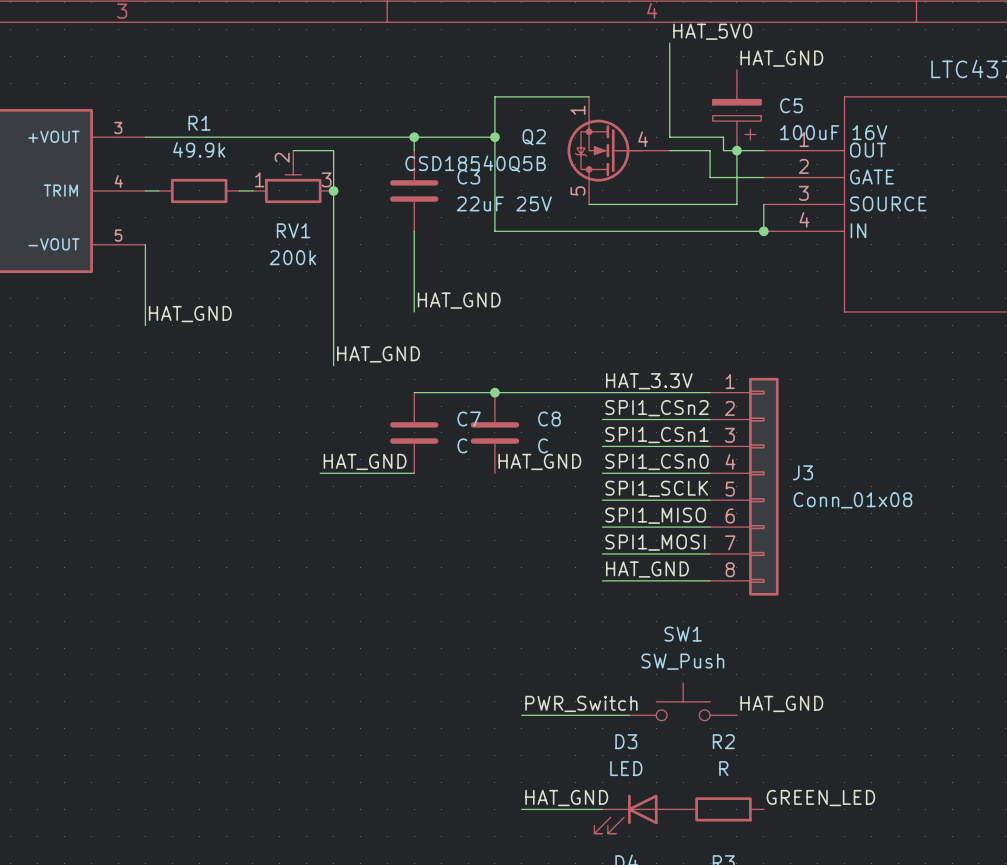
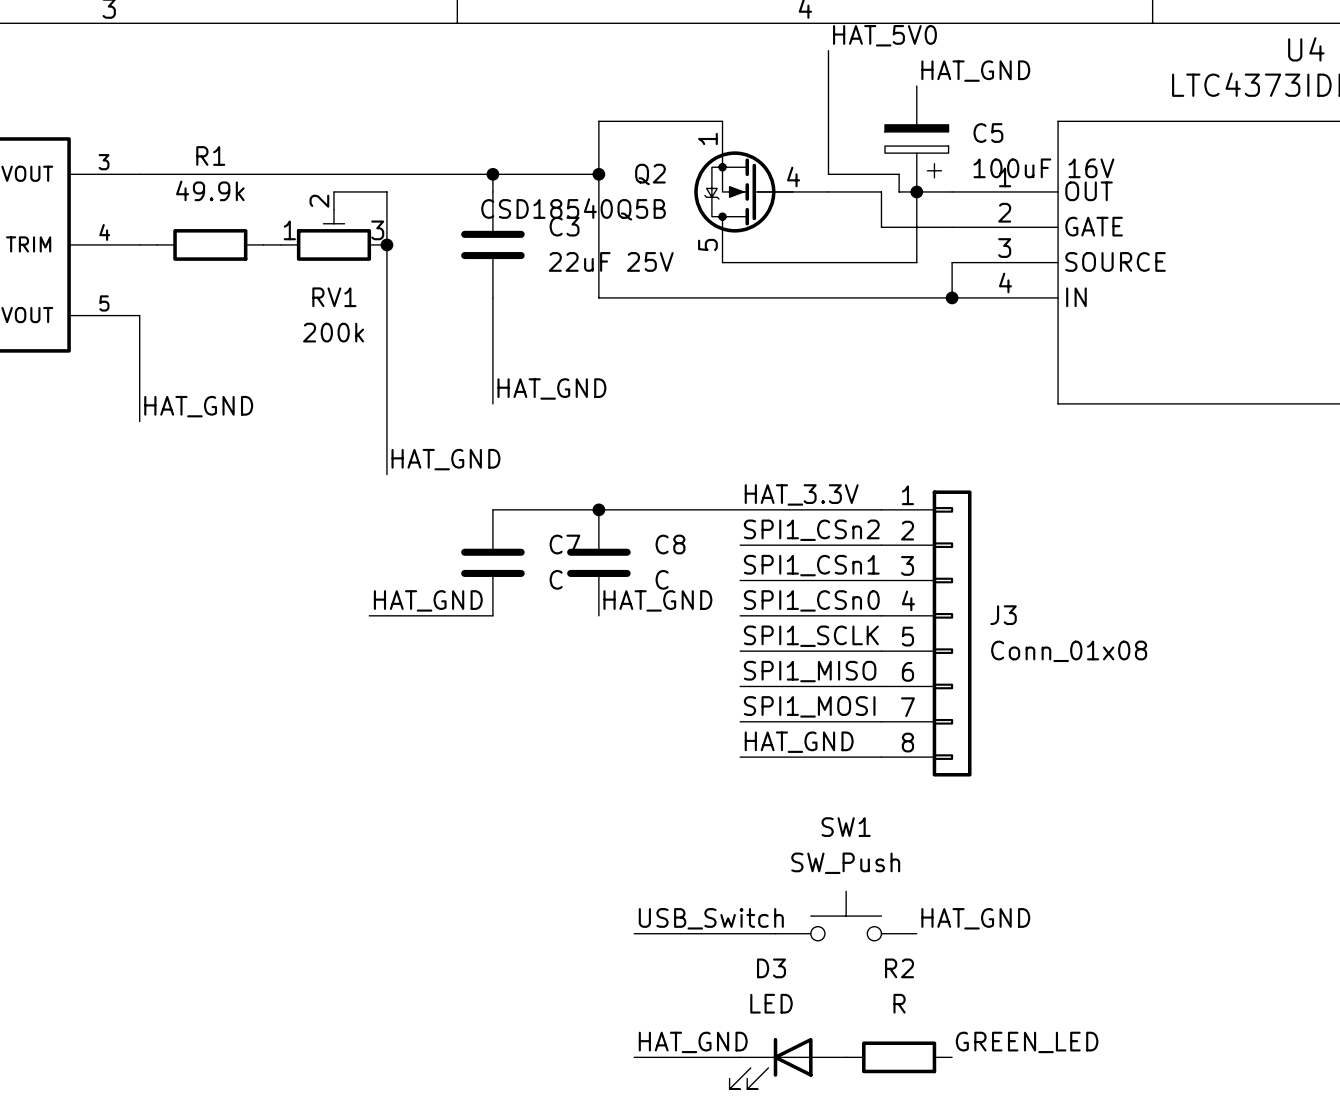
label: PWR_Switch (581, 703) -> USB_Switch (711, 918)

